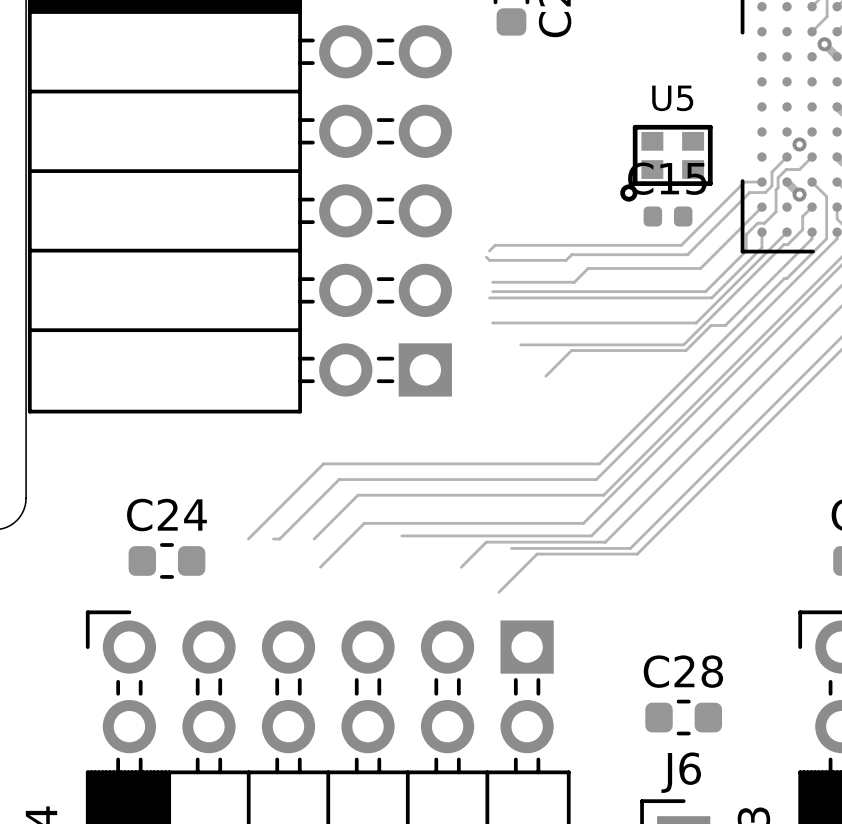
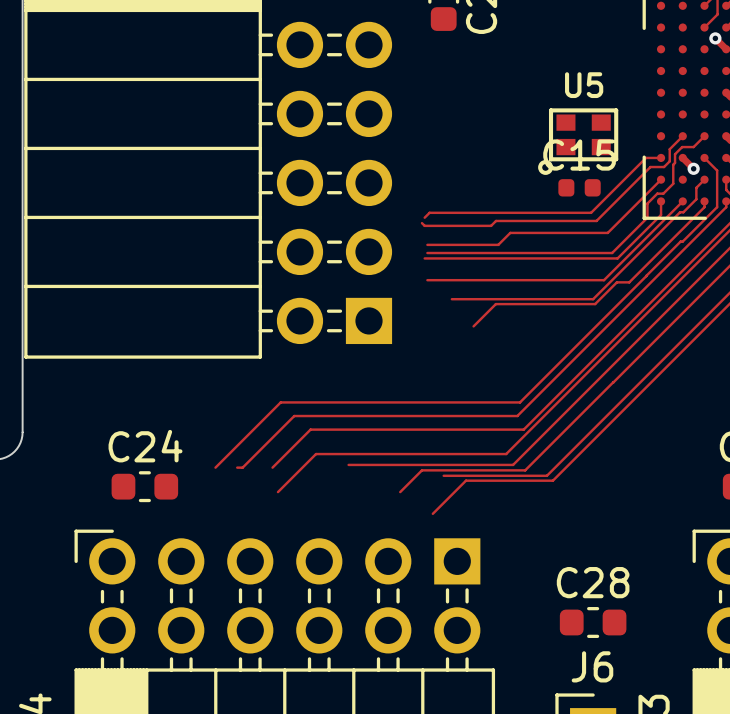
via: (799, 144) -> none

